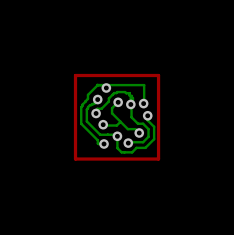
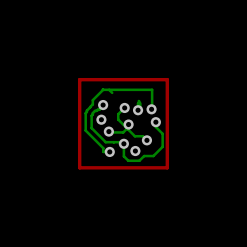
via position: (106, 88) -> (128, 124)
bottom track: (96, 113) (96, 109) (101, 108) (114, 93) (129, 93) (131, 97) (131, 117) (137, 123) (143, 123) (148, 129) (148, 136) (143, 142) (128, 143) -> none

